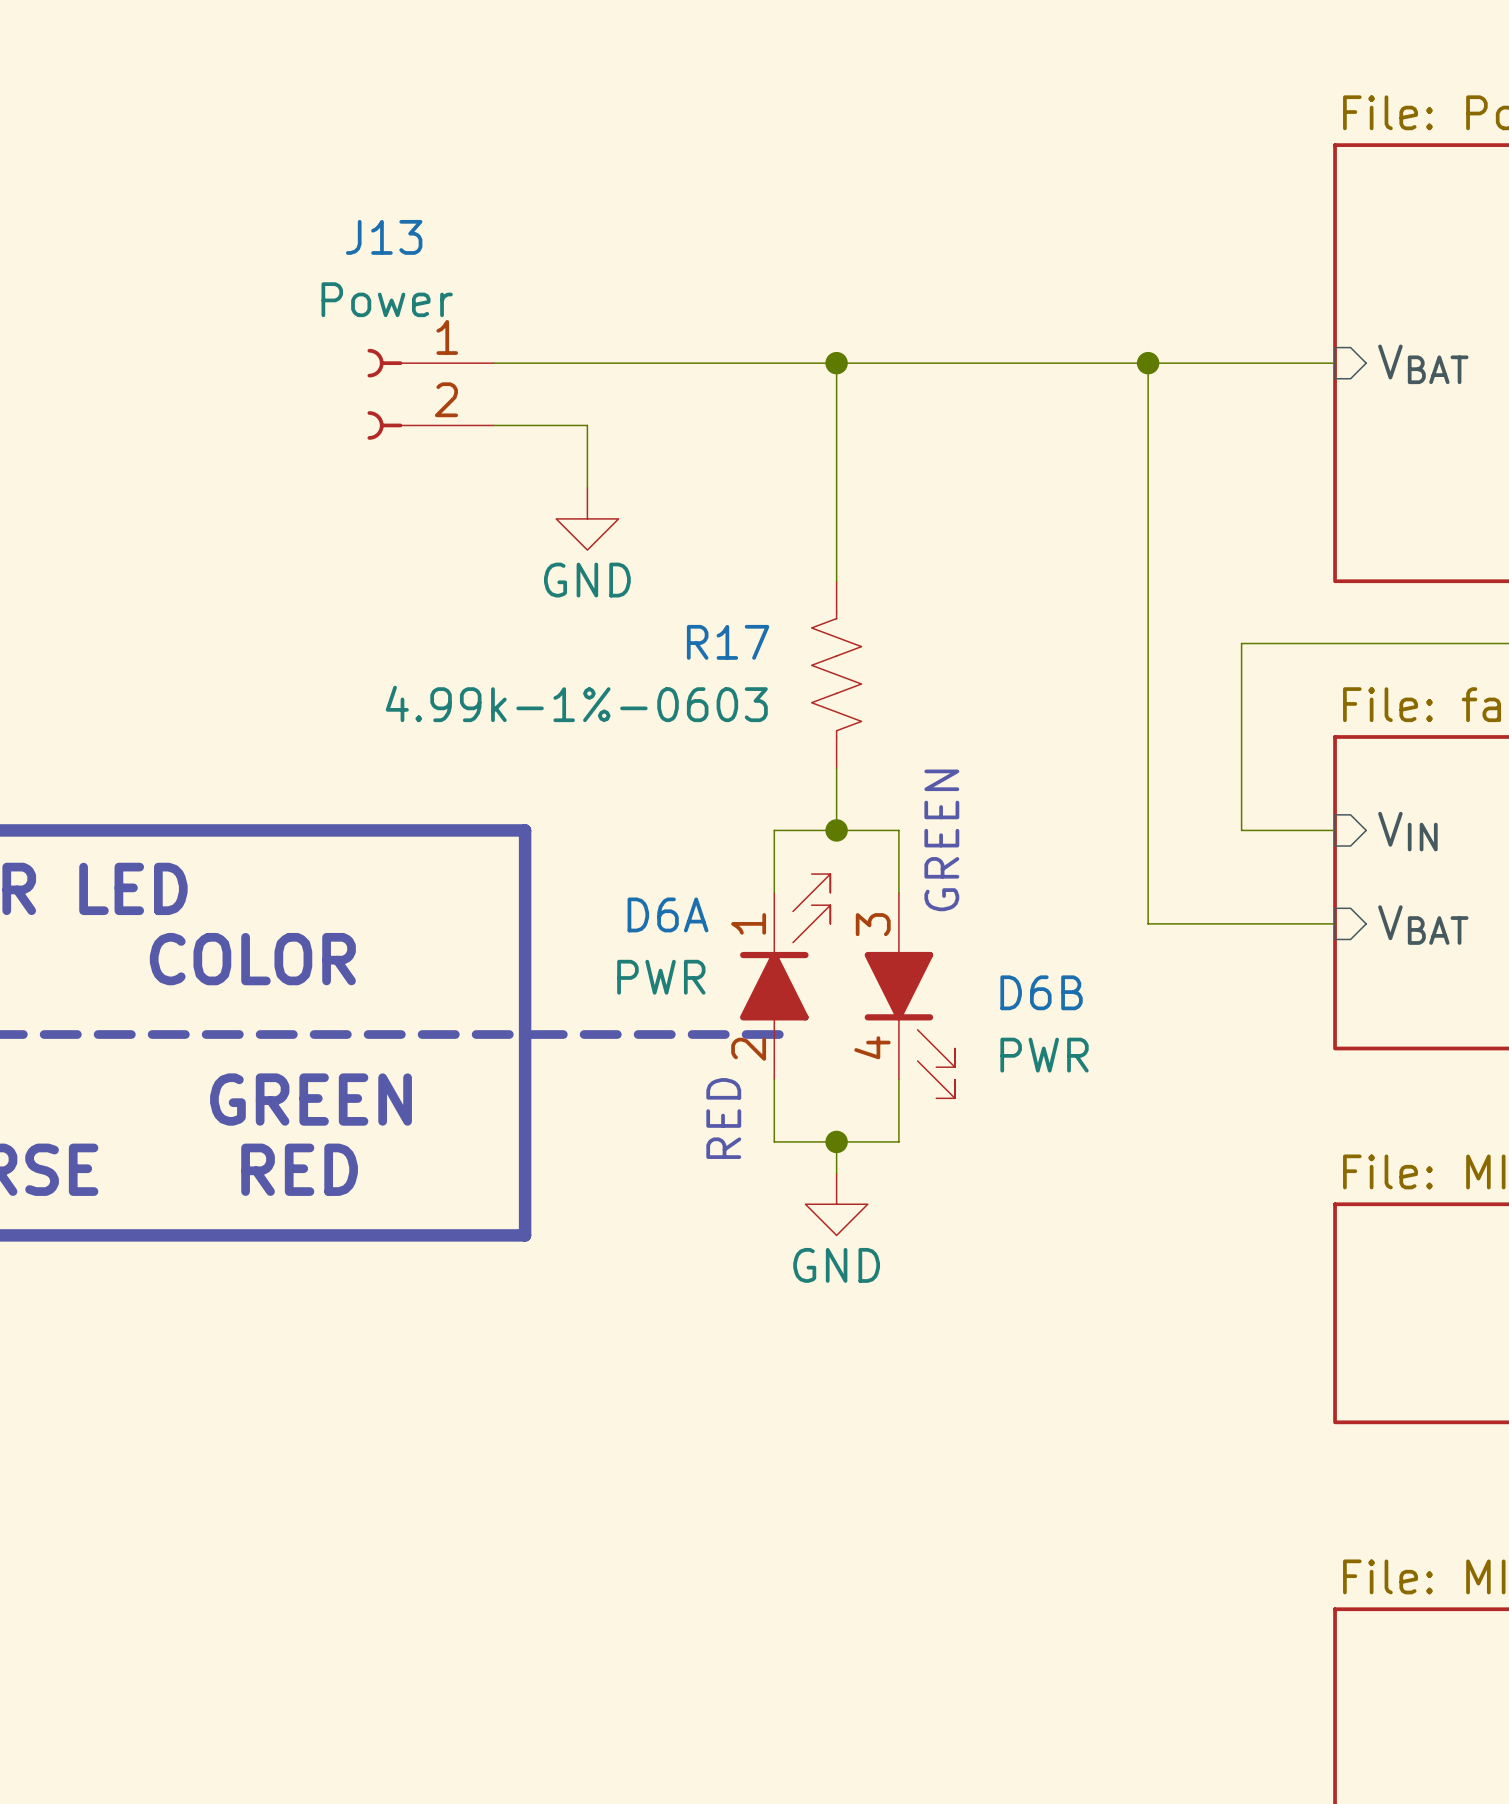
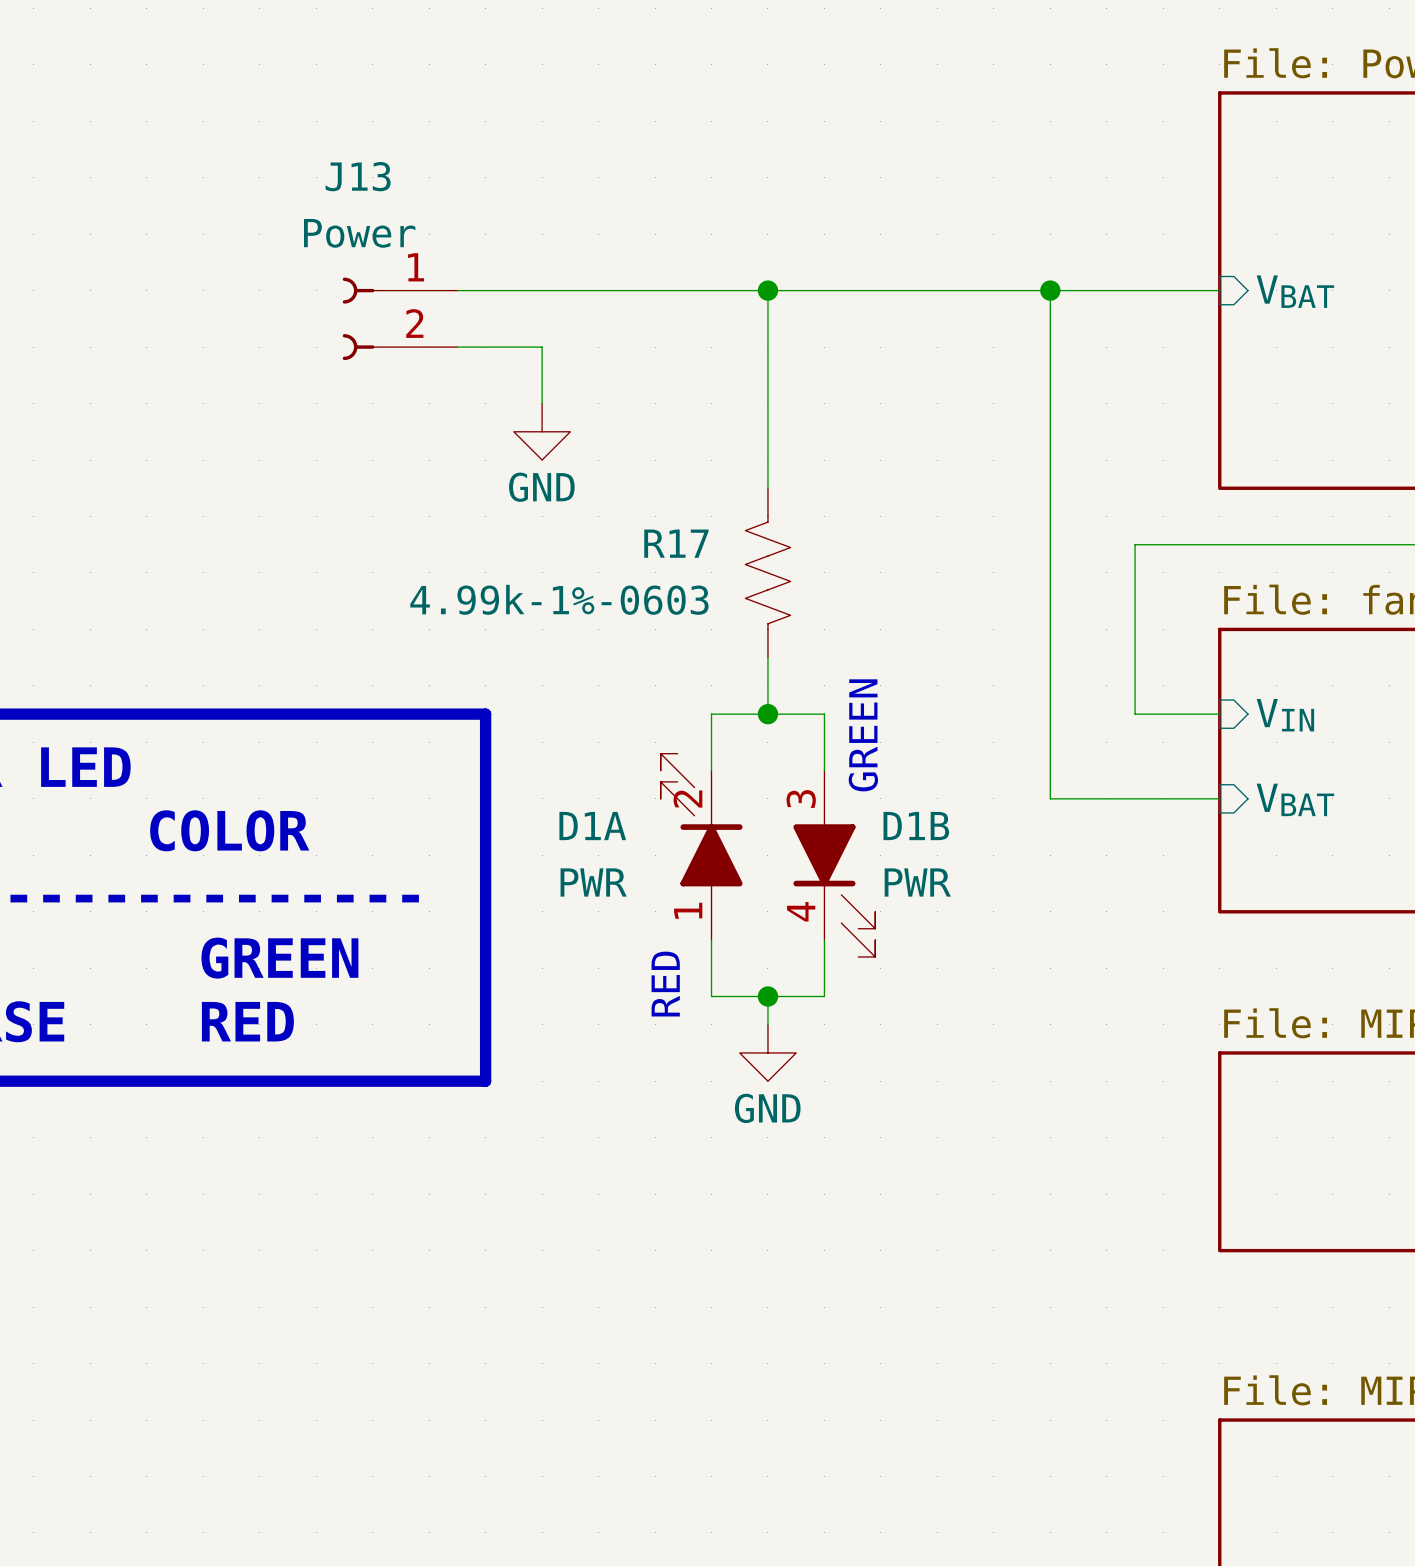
D1A: none -> PWR (701, 846)
D6A: PWR (785, 976) -> none
D6B name: D6B (1041, 992) -> D1B (916, 826)
D6B value position: PWR (1044, 1055) -> PWR (917, 882)

